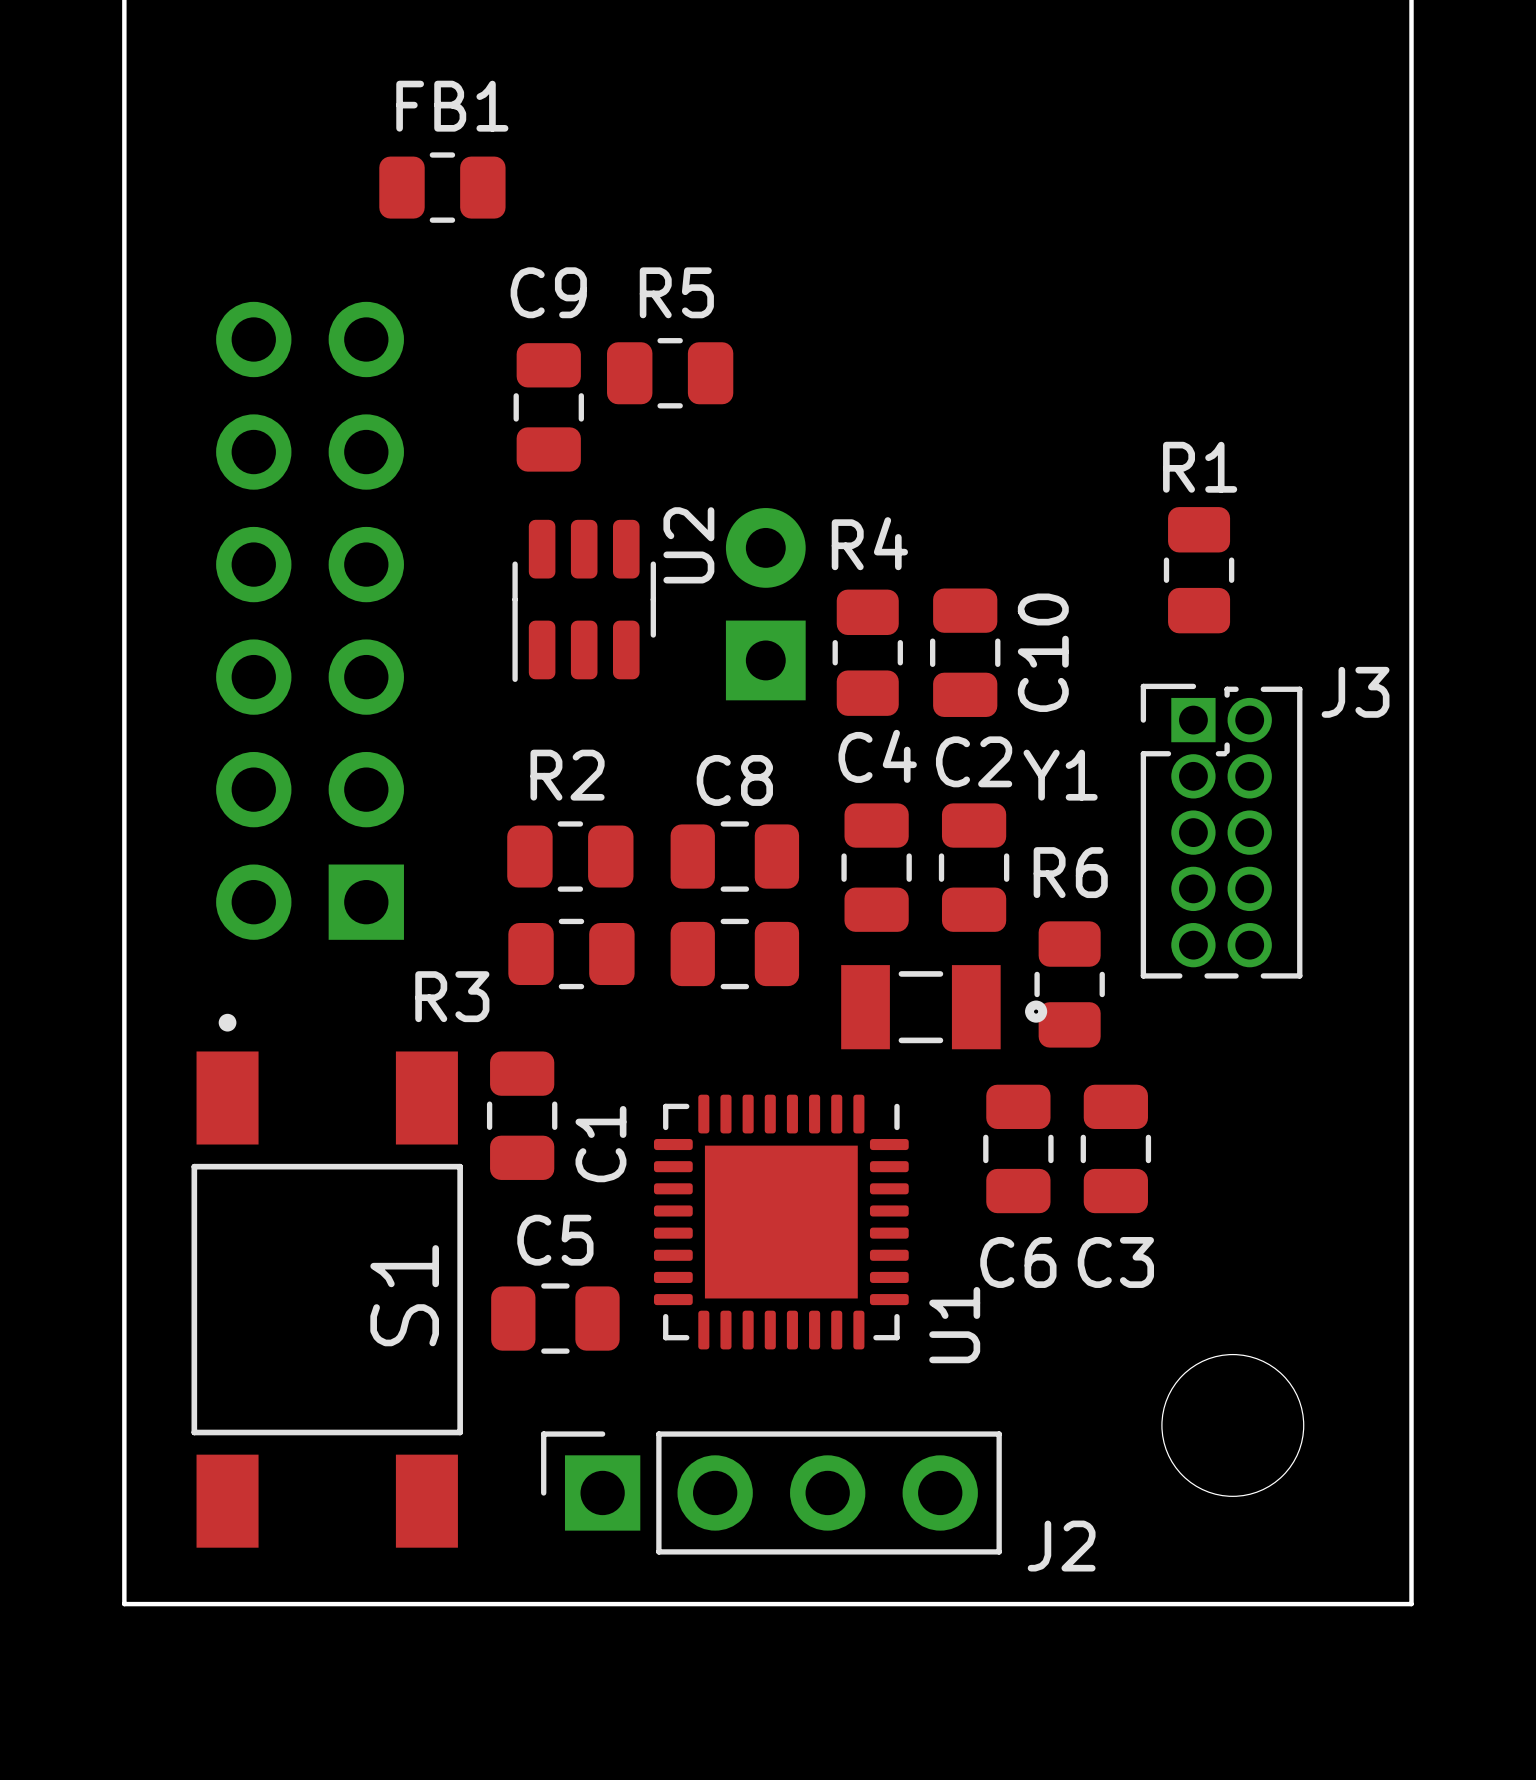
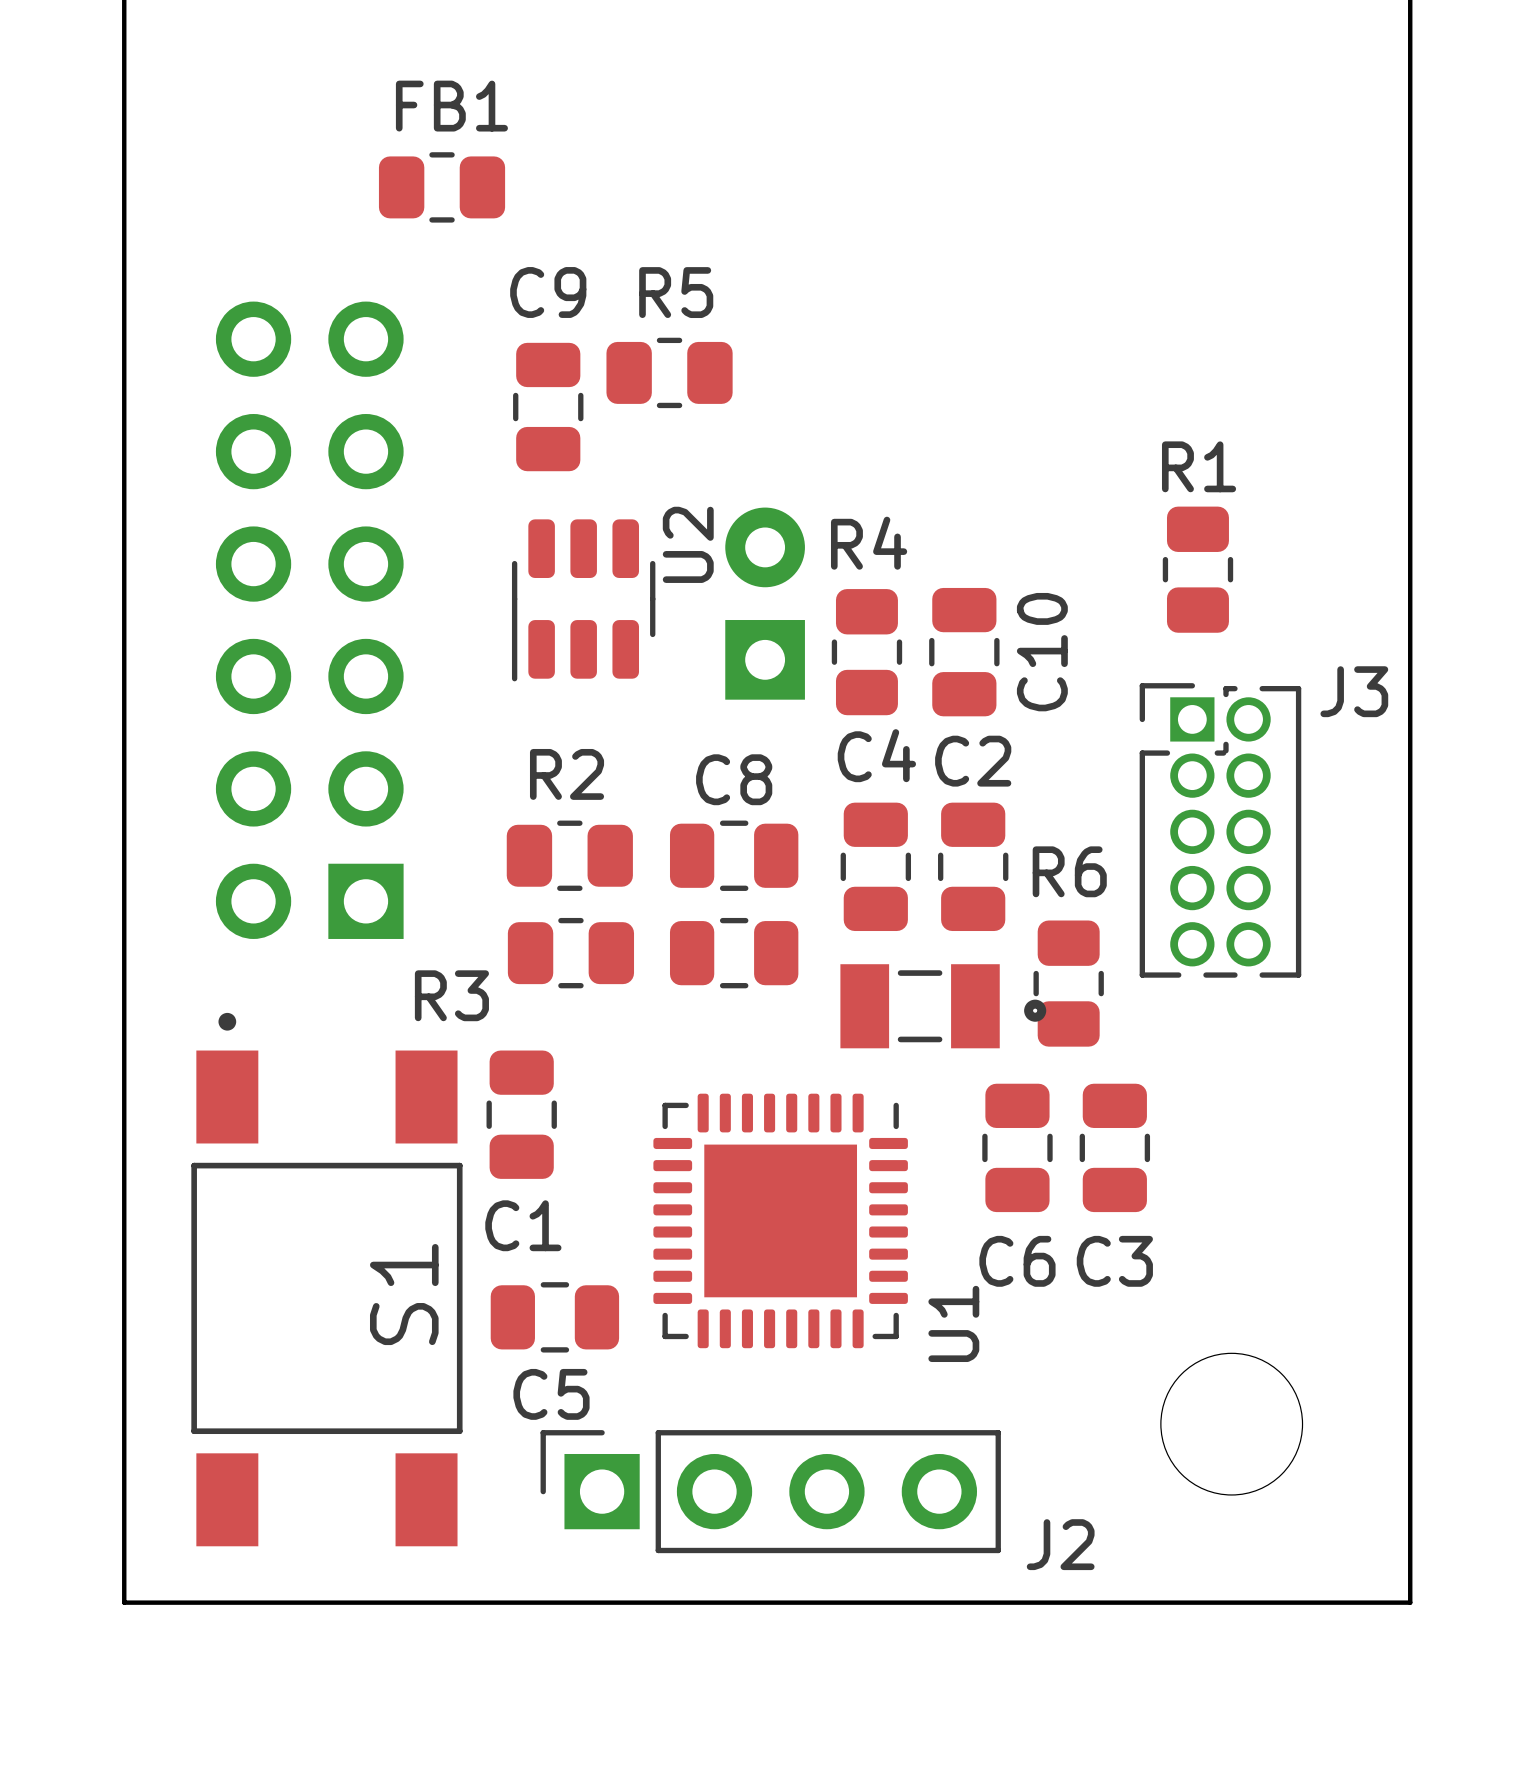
Y1 name: Y1 (1060, 775) -> none
C1 name rotation: 0° (600, 1144) -> 90° clockwise (523, 1225)
C1 name position: C1 (600, 1144) -> C1 (523, 1225)
C5 name position: C5 (555, 1240) -> C5 (551, 1394)

